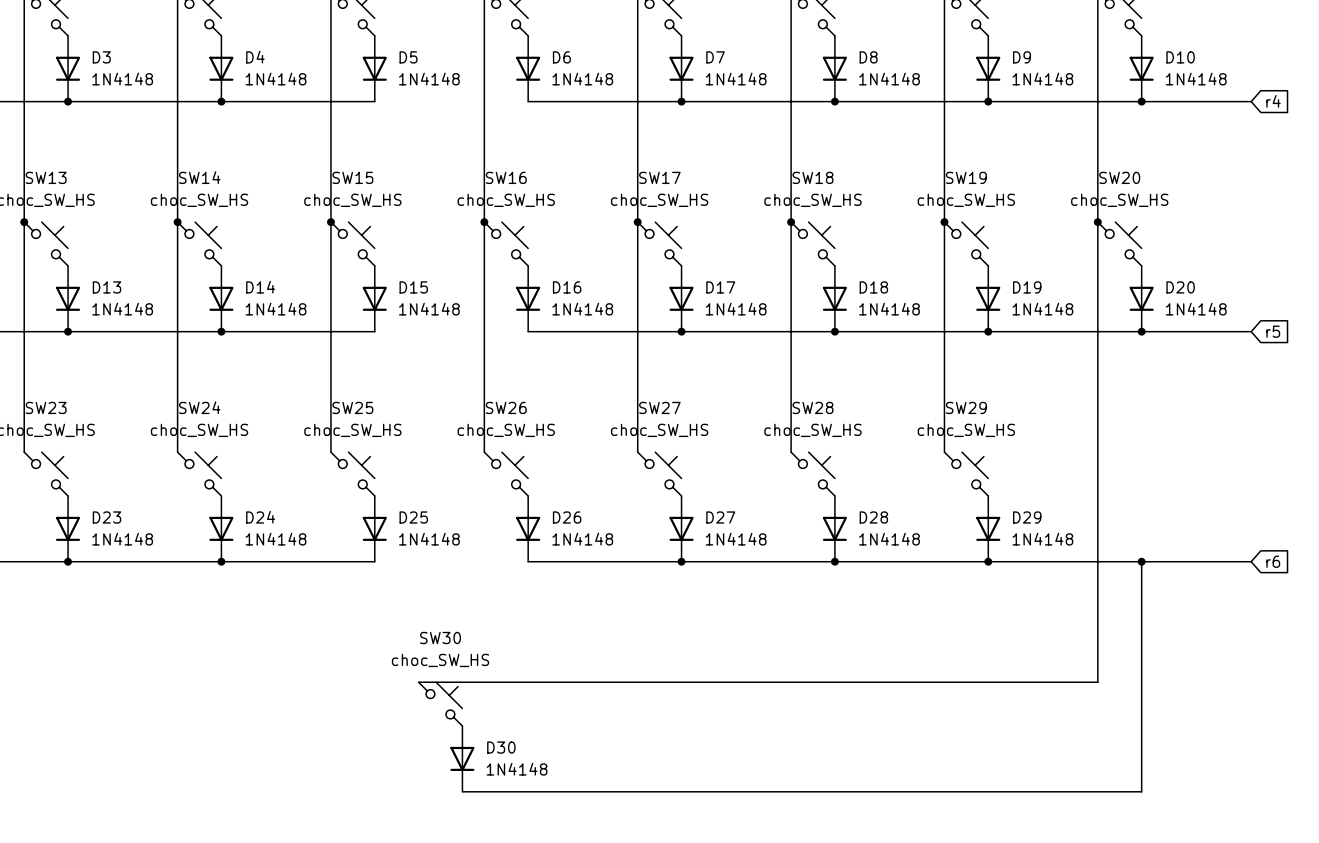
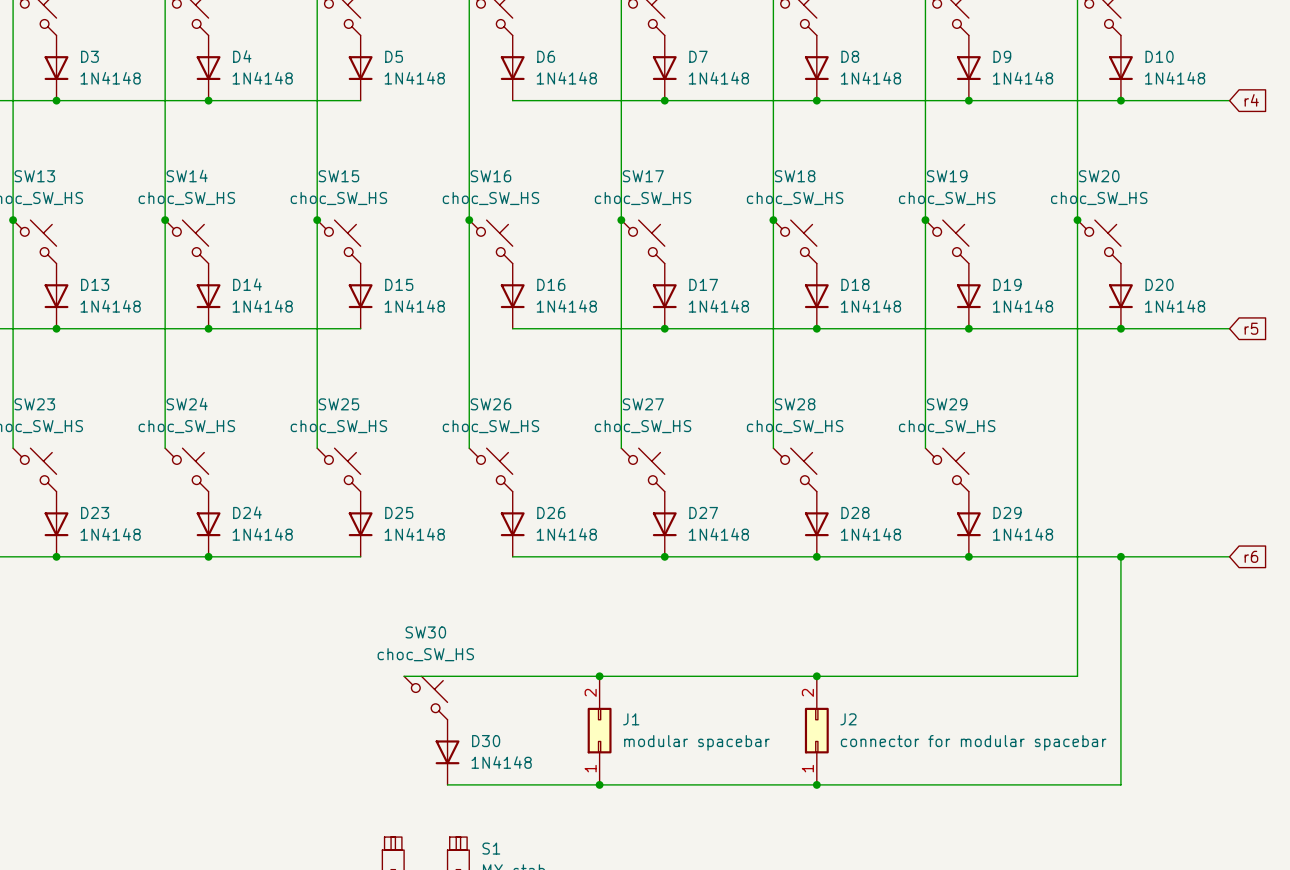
junction: none -> (599, 676)
junction: none -> (816, 676)
J1: none -> modular spacebar (599, 730)
J2: none -> connector for modular spacebar (816, 730)
junction: none -> (599, 784)
junction: none -> (816, 784)

